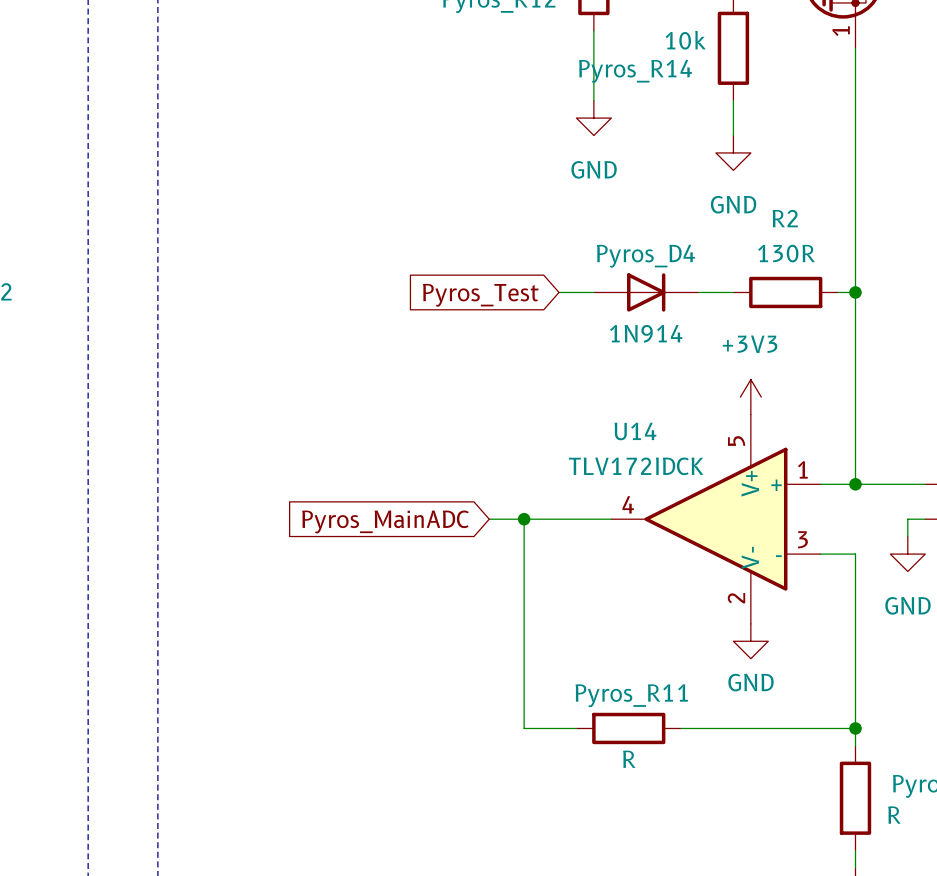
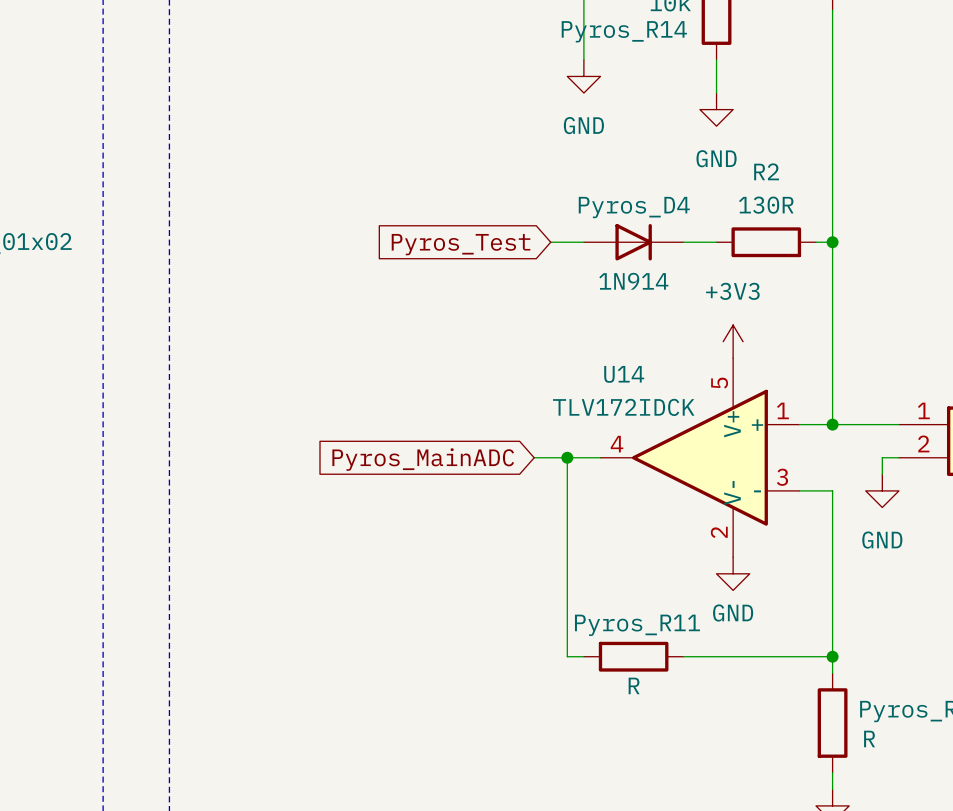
wire: (489, 519) (541, 519) -> none
wire: (524, 519) (524, 728) (576, 728) -> none
junction position: (524, 519) -> (567, 457)
wire: none -> (567, 457) (567, 656) (583, 656)
global label position: Pyros_MainADC (385, 521) -> Pyros_MainADC (423, 459)
Pyros_R11 position: (628, 728) -> (633, 656)

